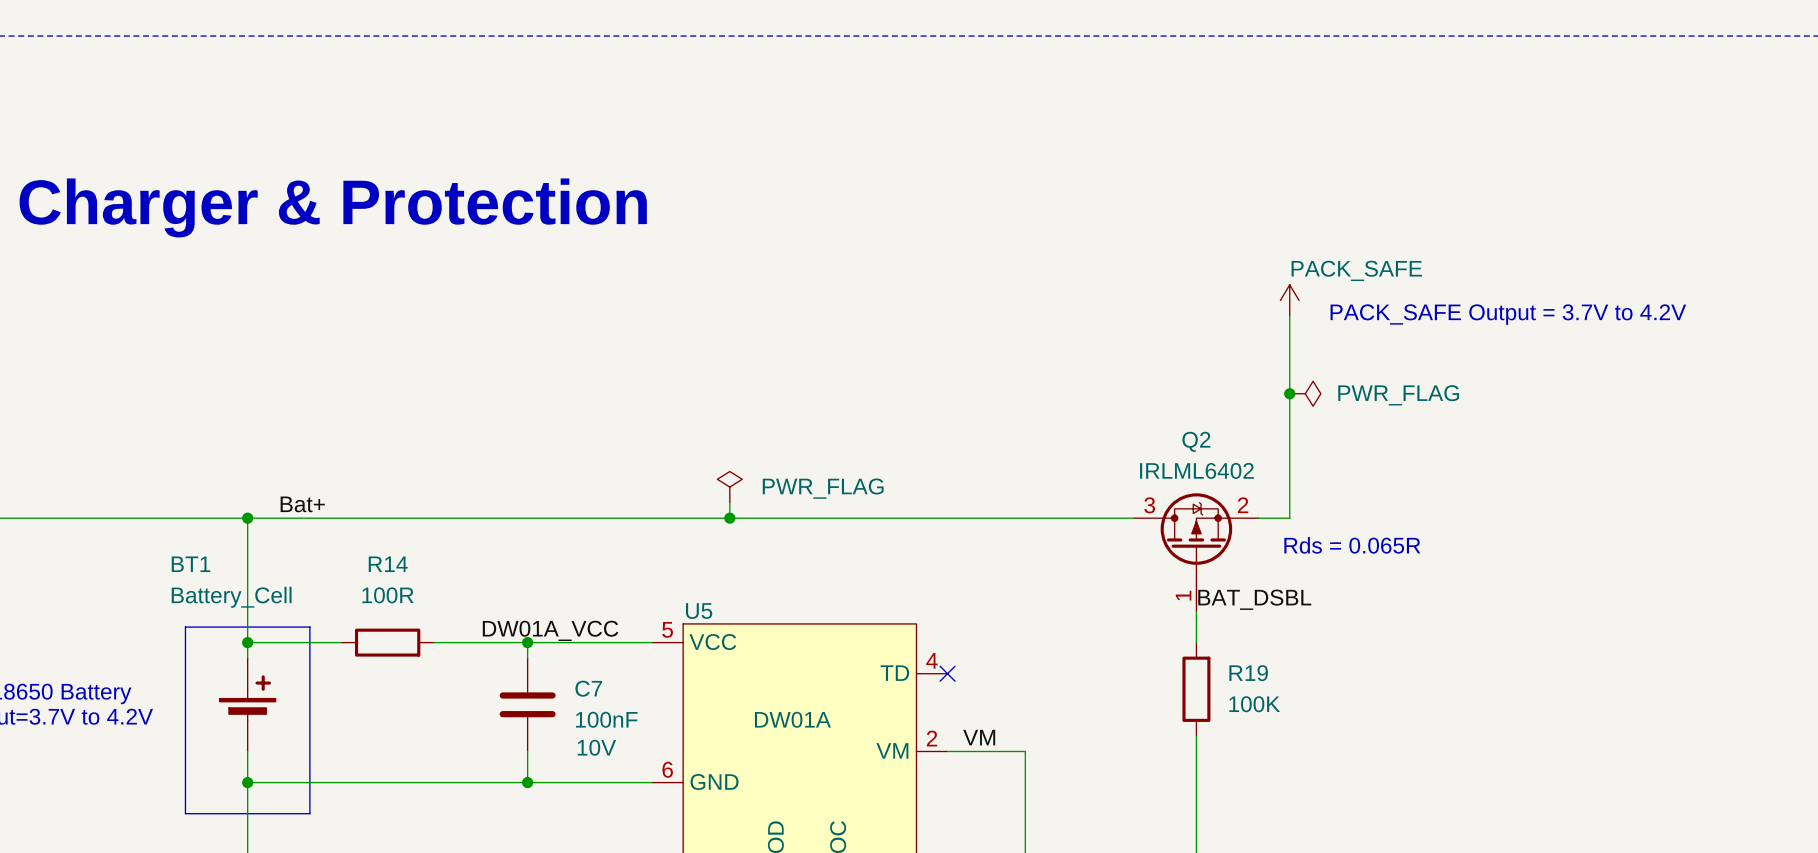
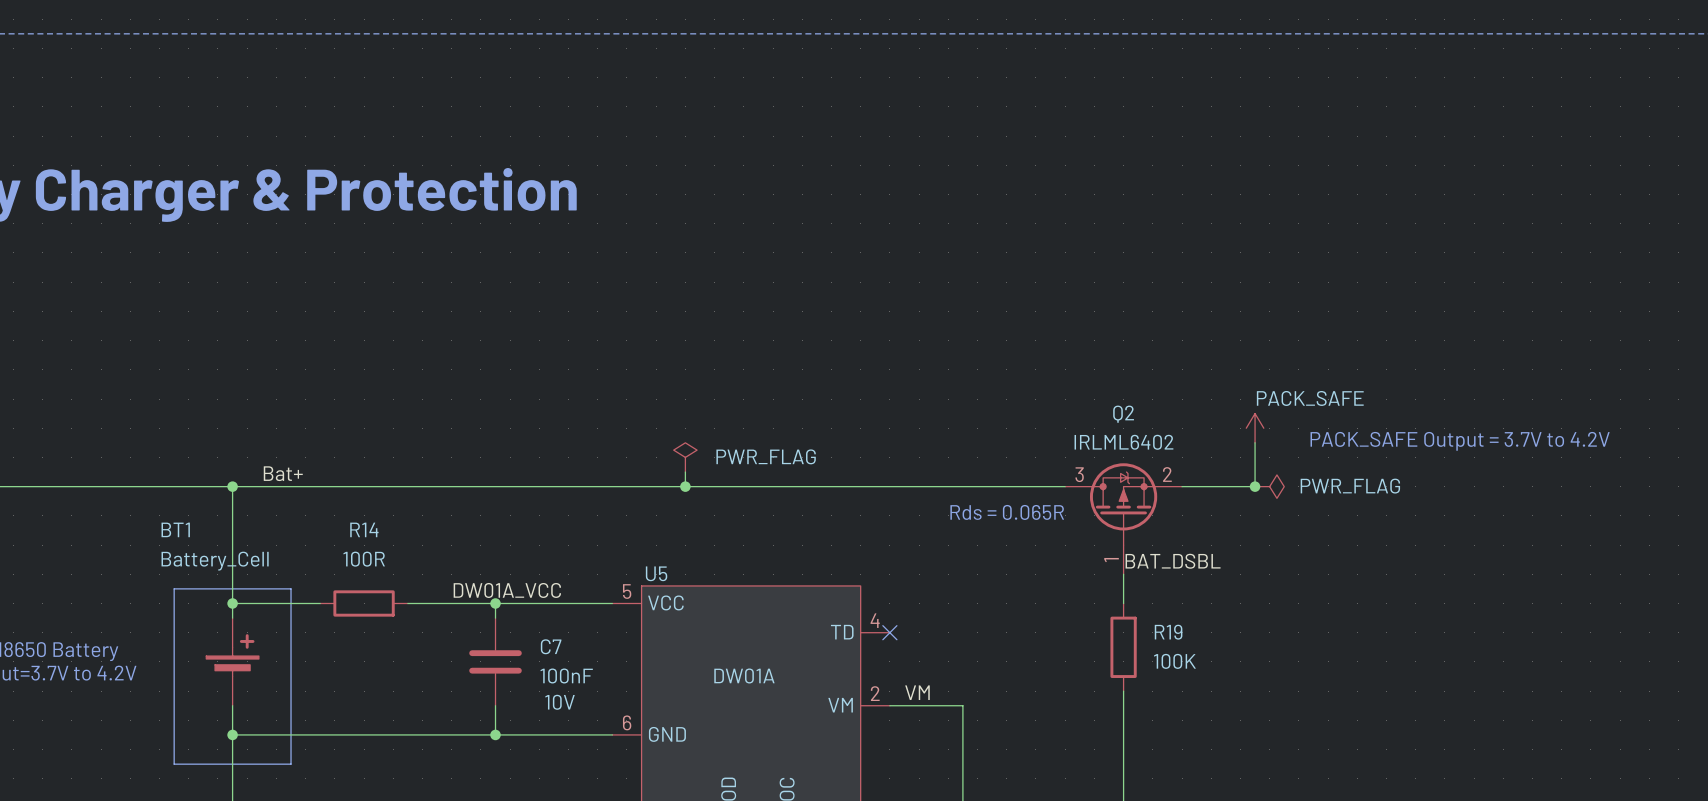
power symbol position: PACK_SAFE (1289, 300) -> PACK_SAFE (1255, 428)
text position: PACK_SAFE Output = 3.7V to 4.2V (1508, 314) -> PACK_SAFE Output = 3.7V to 4.2V (1460, 441)
wire: (1289, 315) (1289, 518) -> (1255, 442) (1255, 486) (1211, 486)
junction: (1289, 393) -> none
power symbol position: PWR_FLAG (1305, 393) -> PWR_FLAG (1269, 486)
junction: none -> (1255, 486)
text position: Rds = 0.065R (1352, 545) -> Rds = 0.065R (1007, 512)

